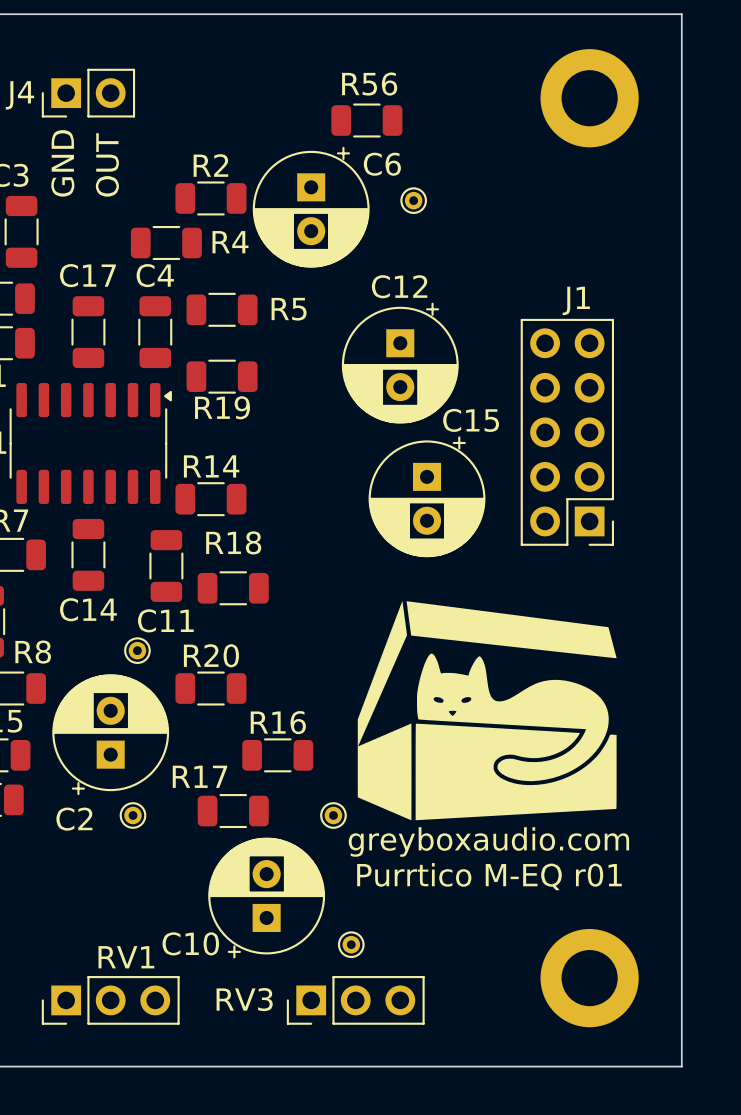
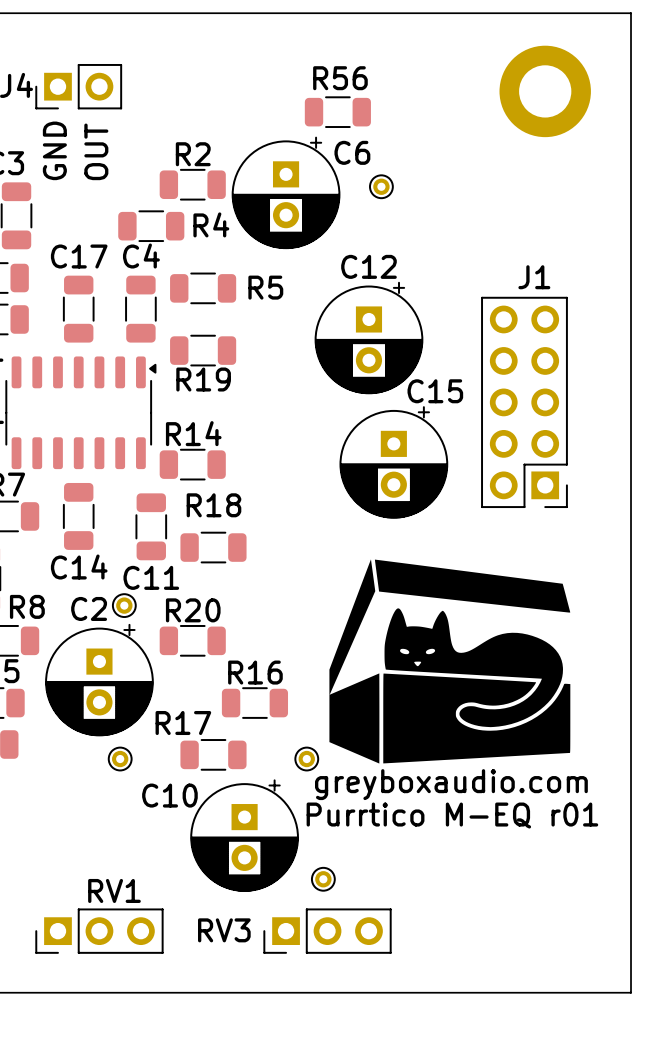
C2 rotation: 0° (110, 734) -> 180° (99, 680)
C2 name position: C2 (74, 819) -> C2 (89, 608)
C10 rotation: 0° (266, 898) -> 180° (244, 835)
C10 name position: C10 (190, 943) -> C10 (169, 795)
part: (589, 978) -> none

